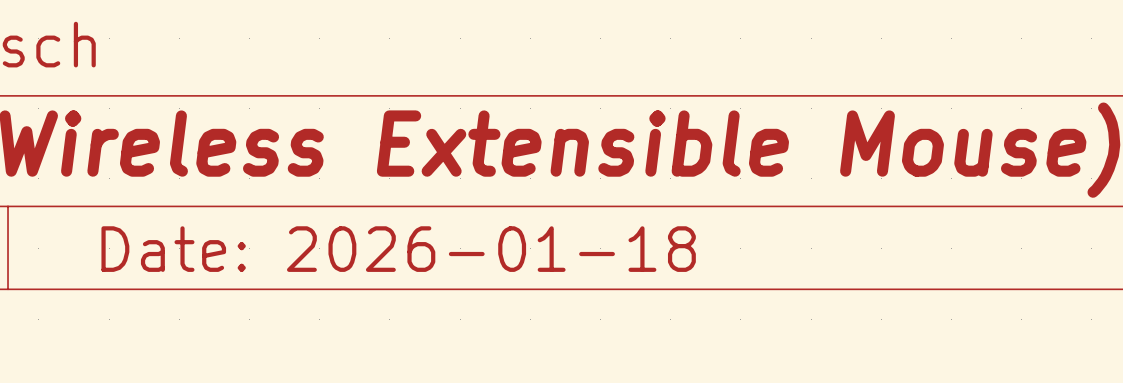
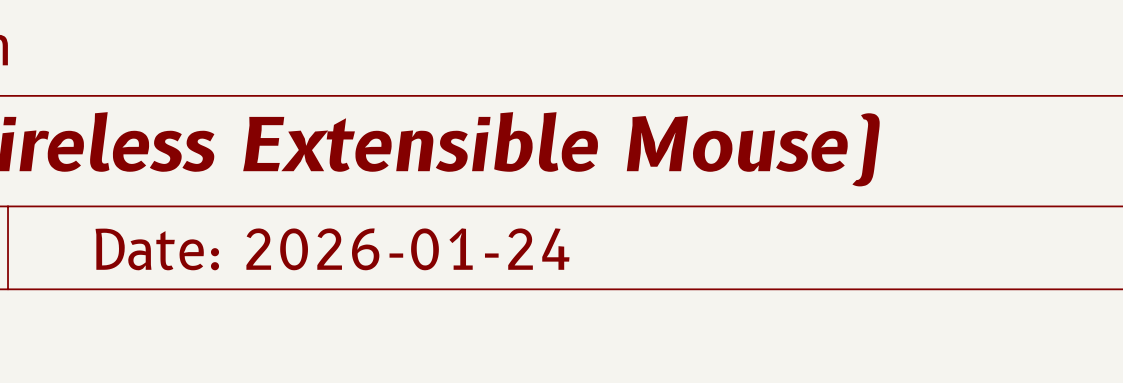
title block: Date: 2026-01-18 (398, 249) -> Date: 2026-01-24 (332, 249)

